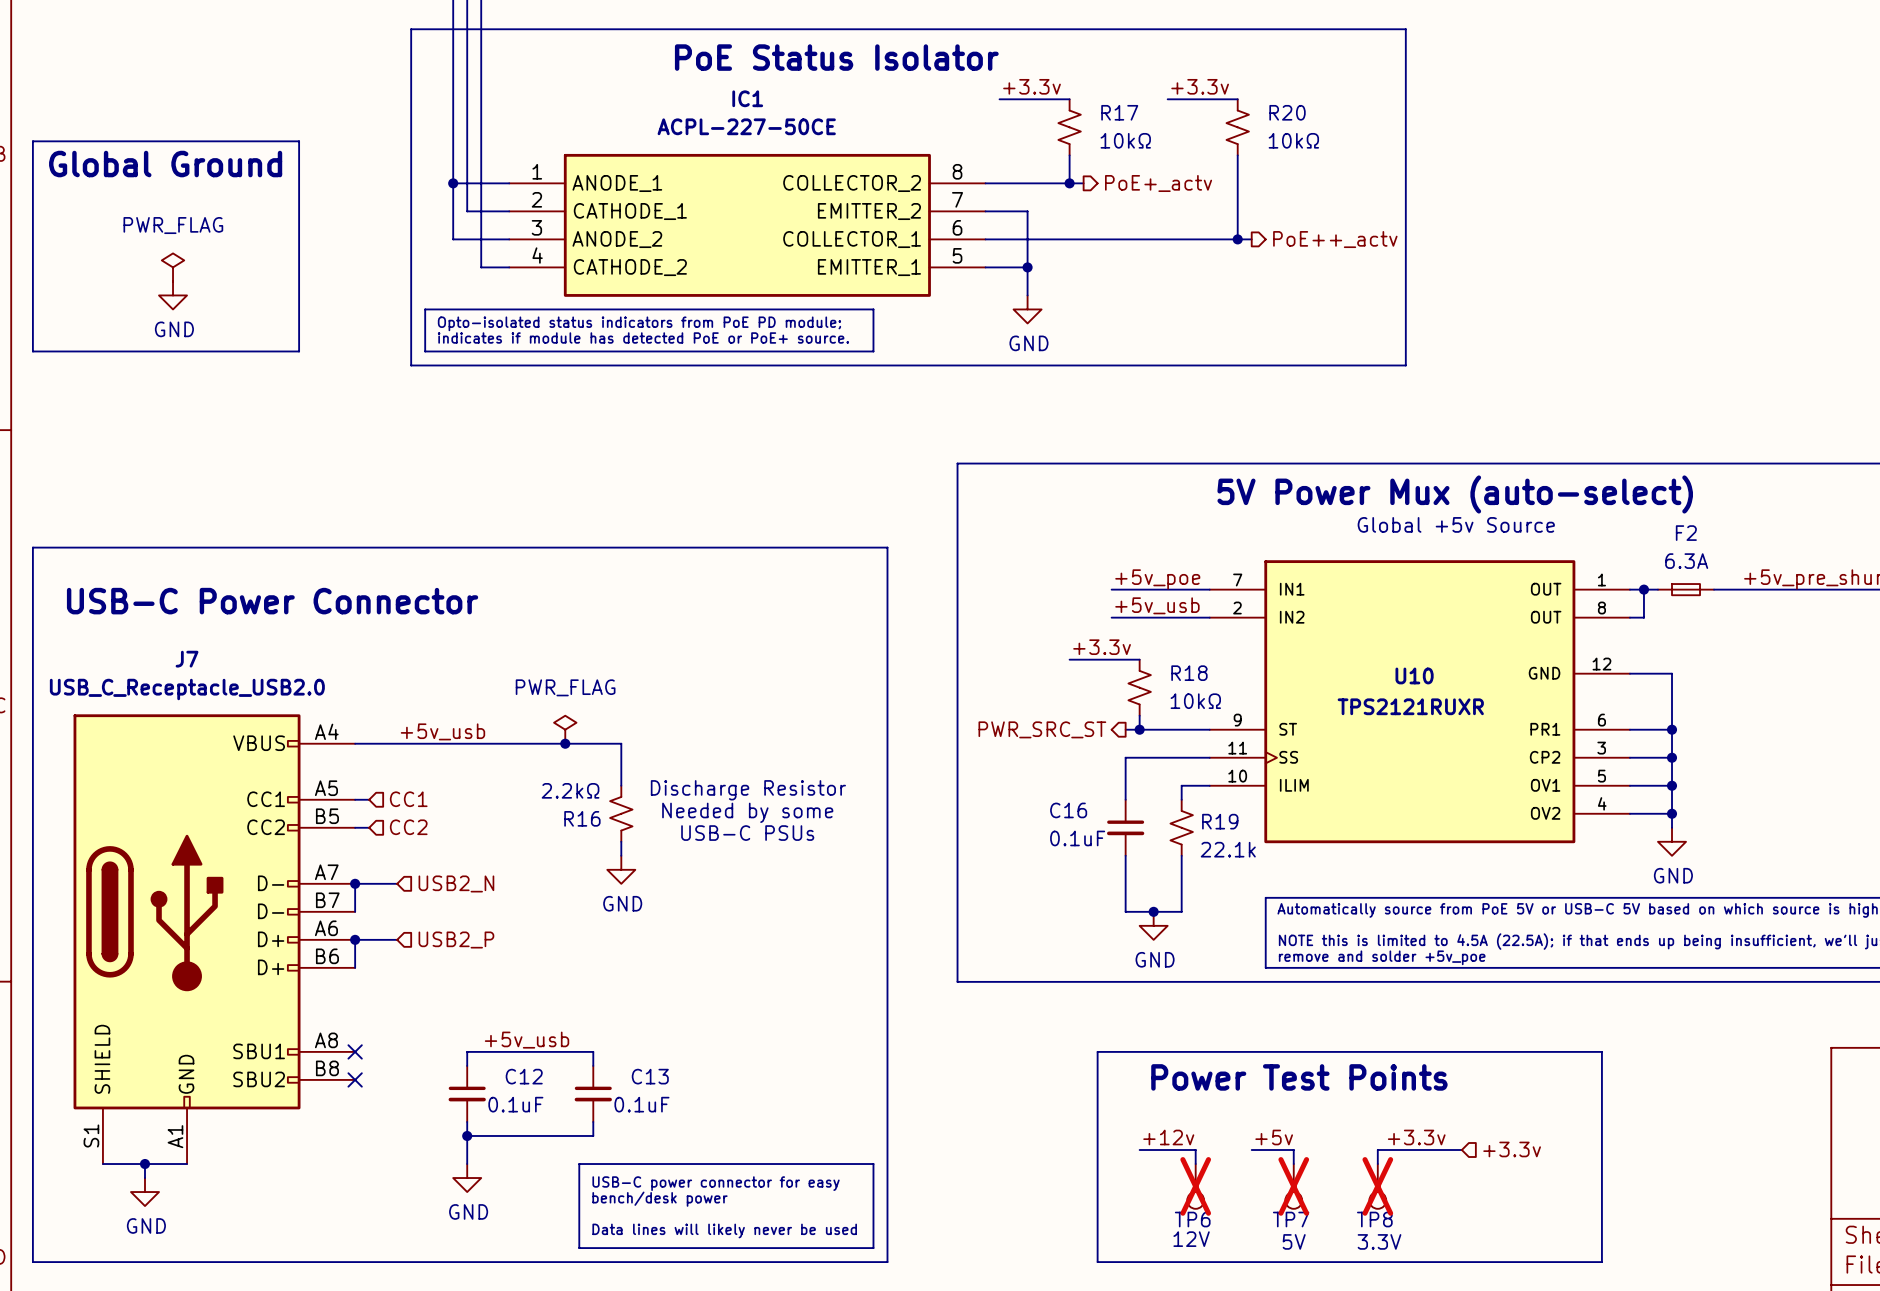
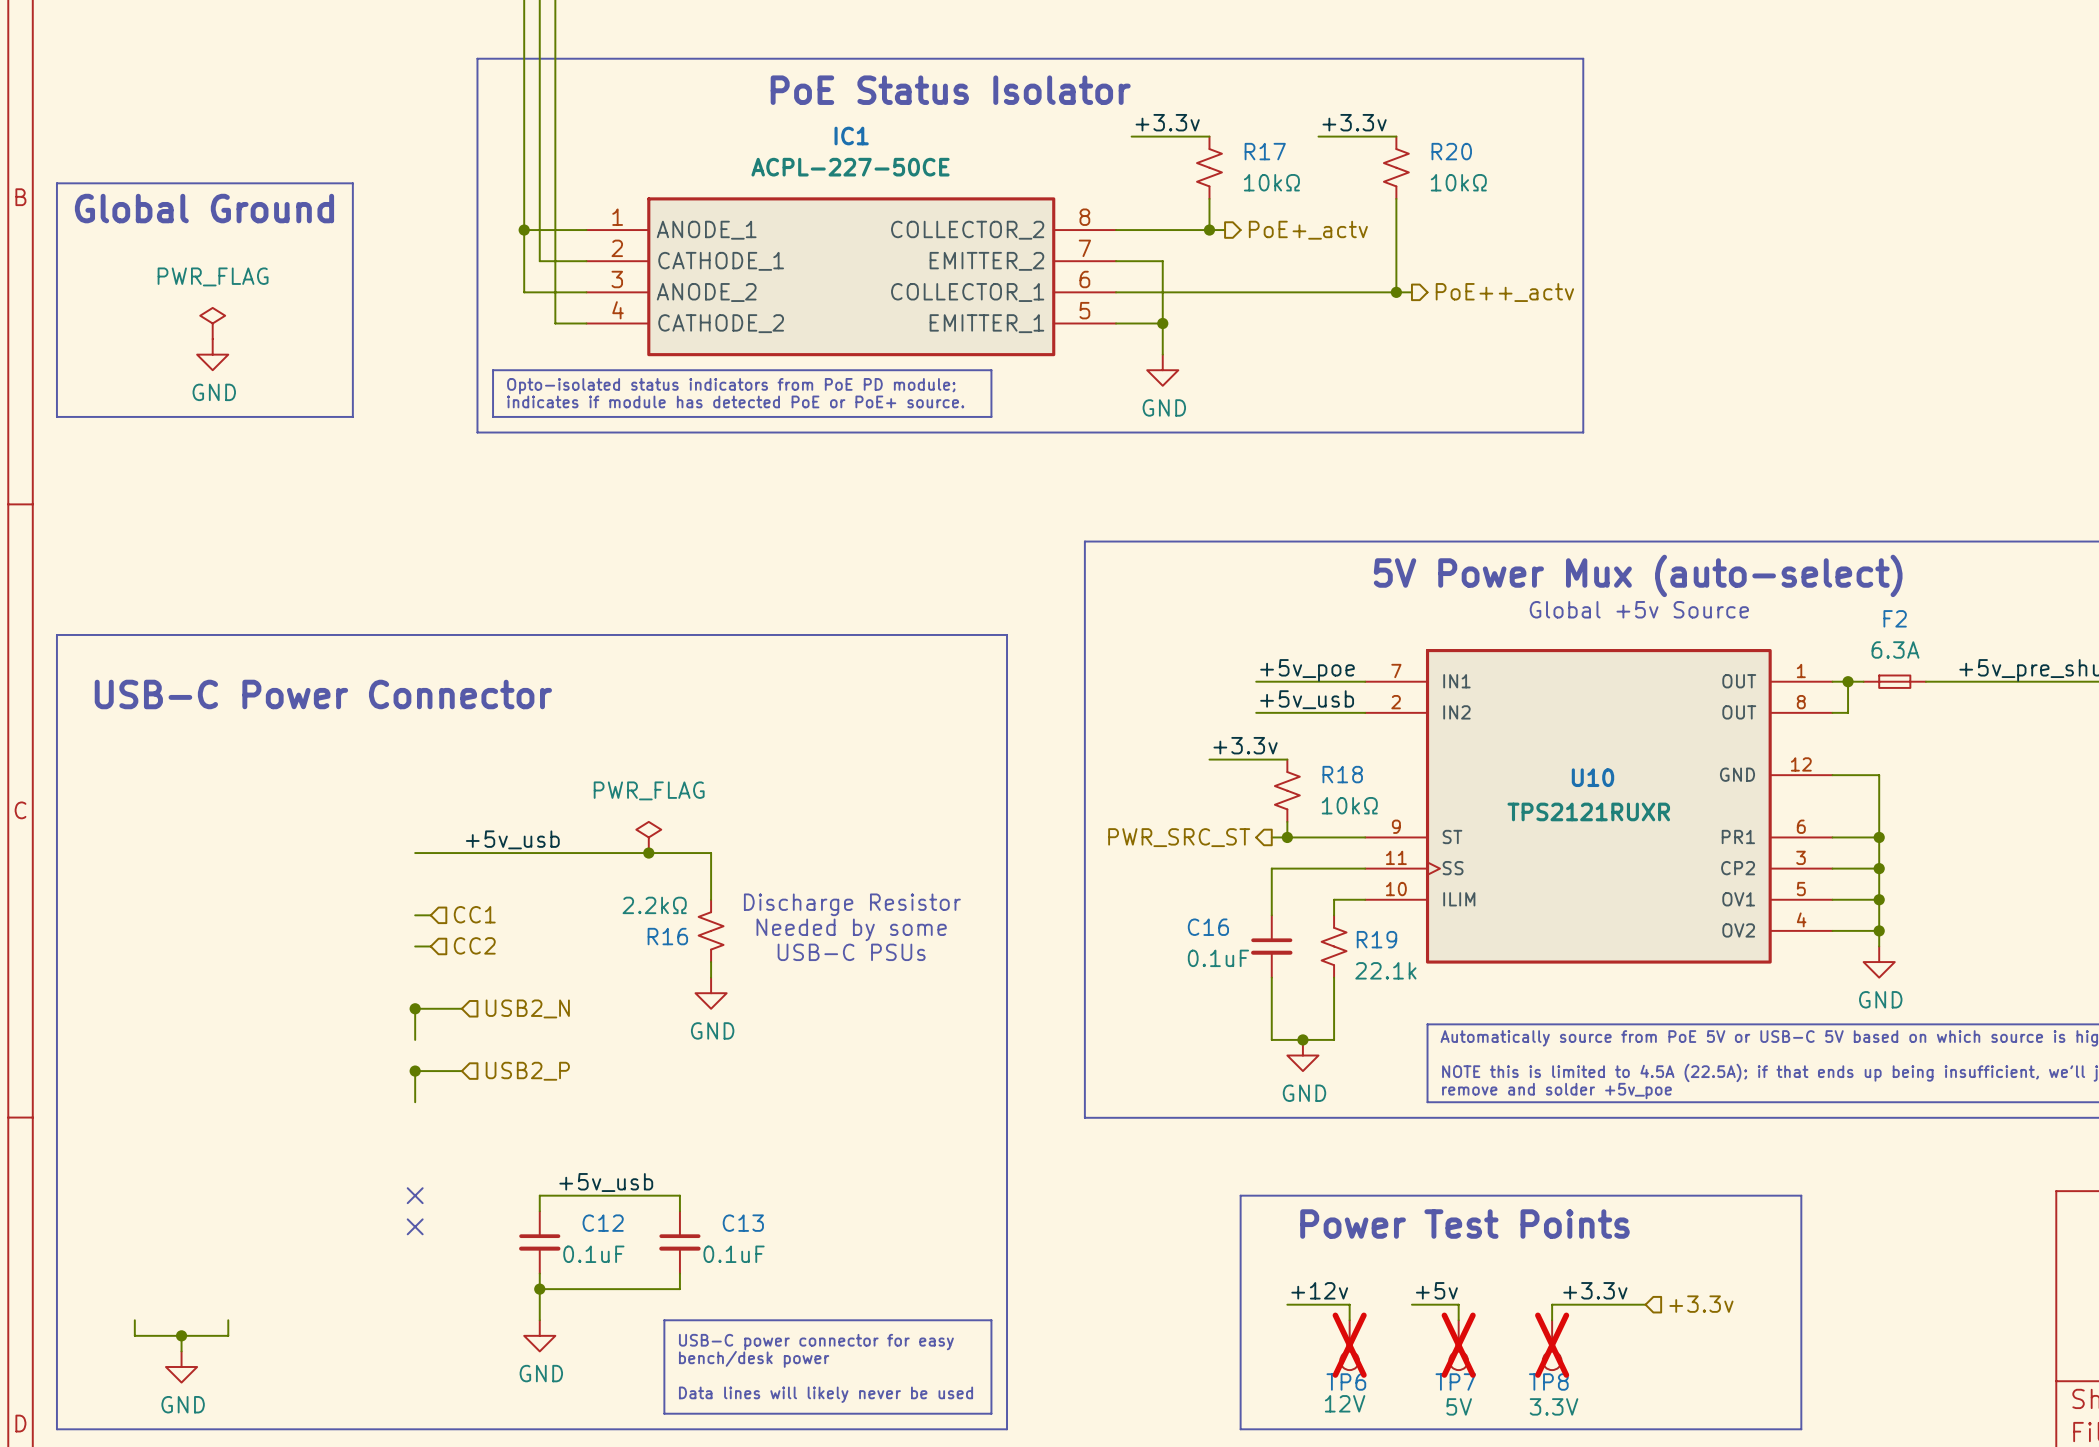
J7: USB_C_Receptacle_USB2.0 (214, 939) -> none
wire: (102, 1164) (187, 1164) -> (134, 1320) (134, 1335) (228, 1335) (228, 1320)
junction position: (144, 1164) -> (181, 1335)
power symbol position: GND (144, 1192) -> GND (181, 1366)

